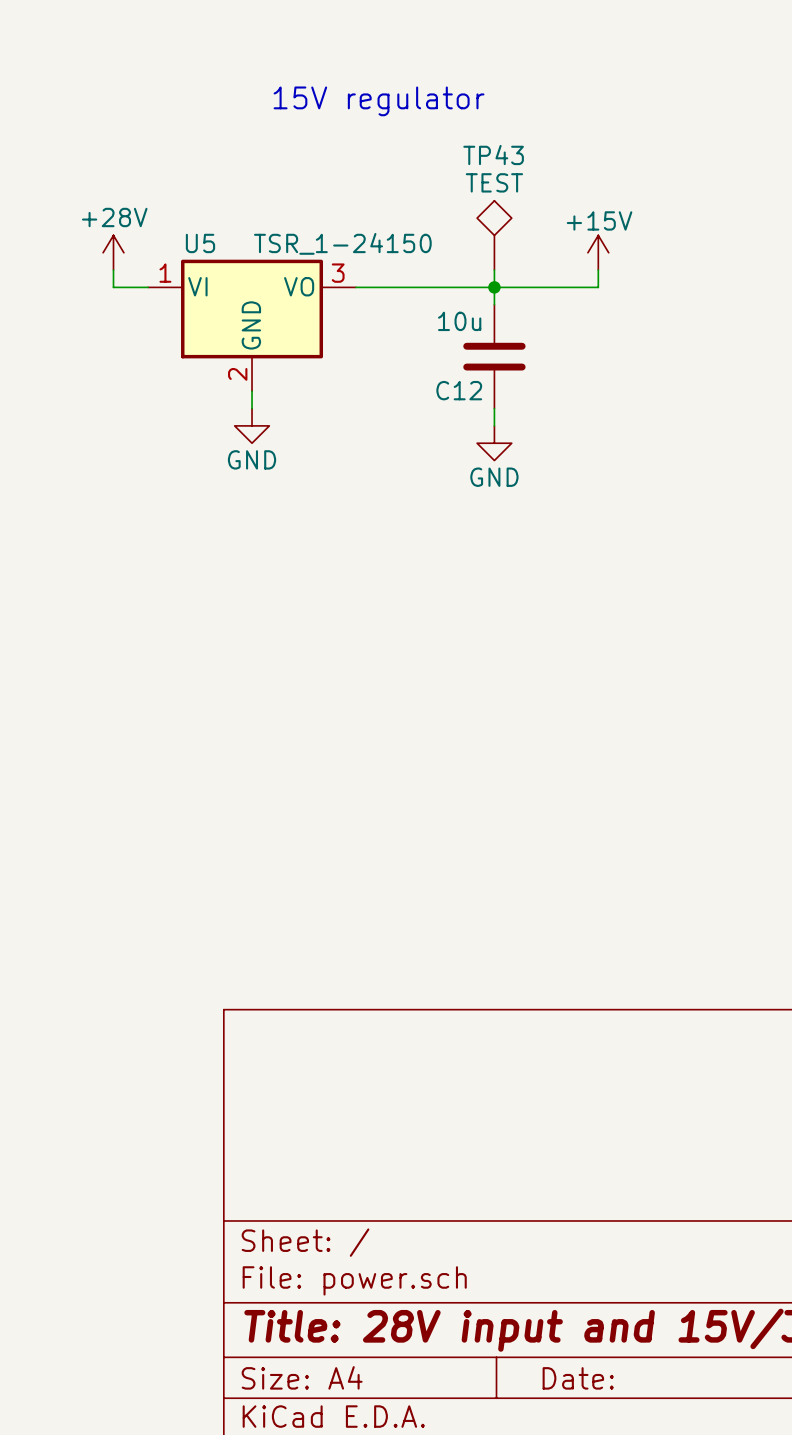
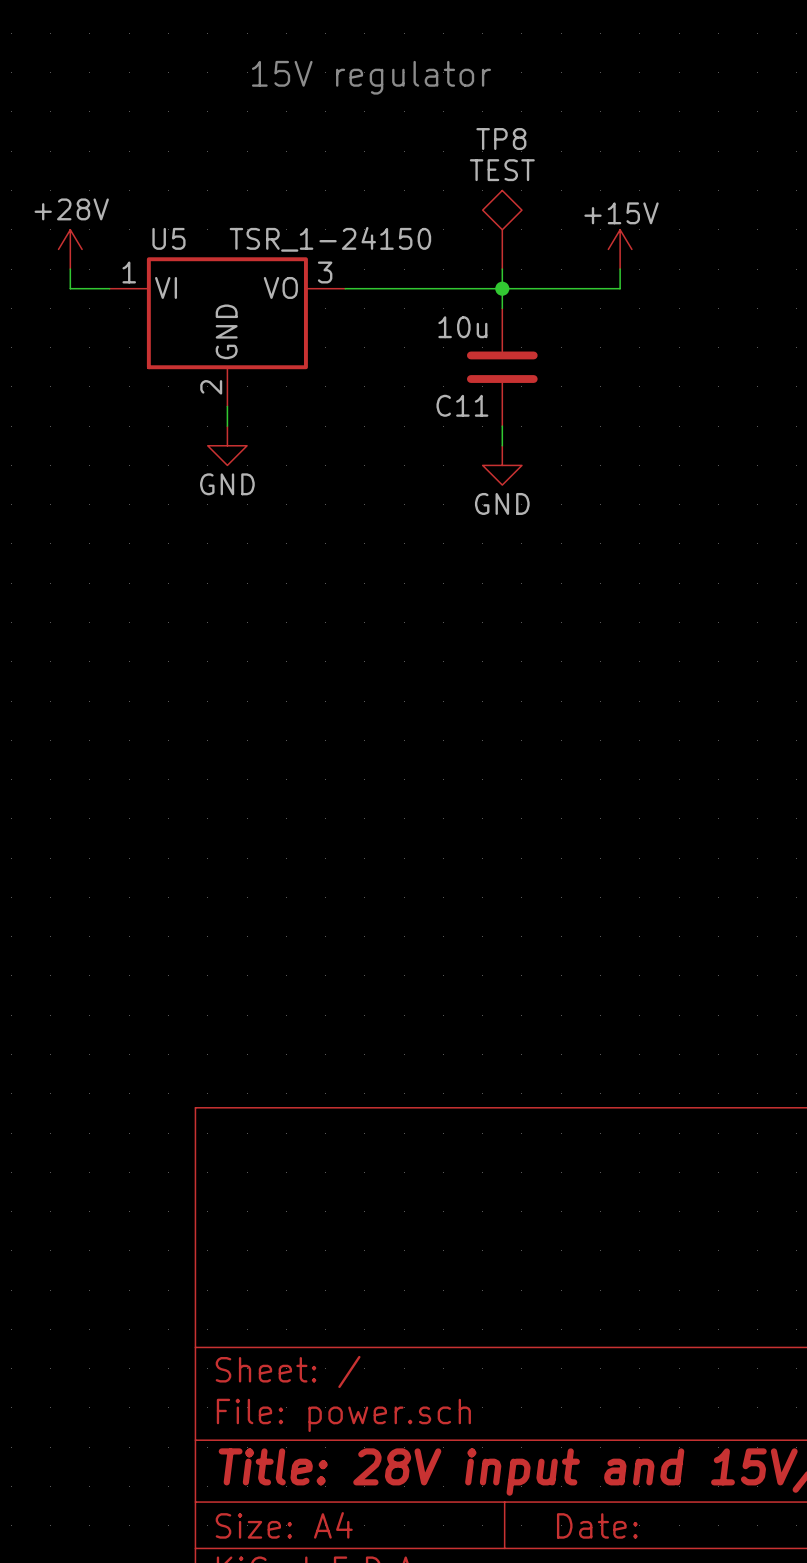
TP43 name: TP43 (493, 155) -> TP8 (501, 139)
C12 name: C12 (459, 390) -> C11 (462, 405)

